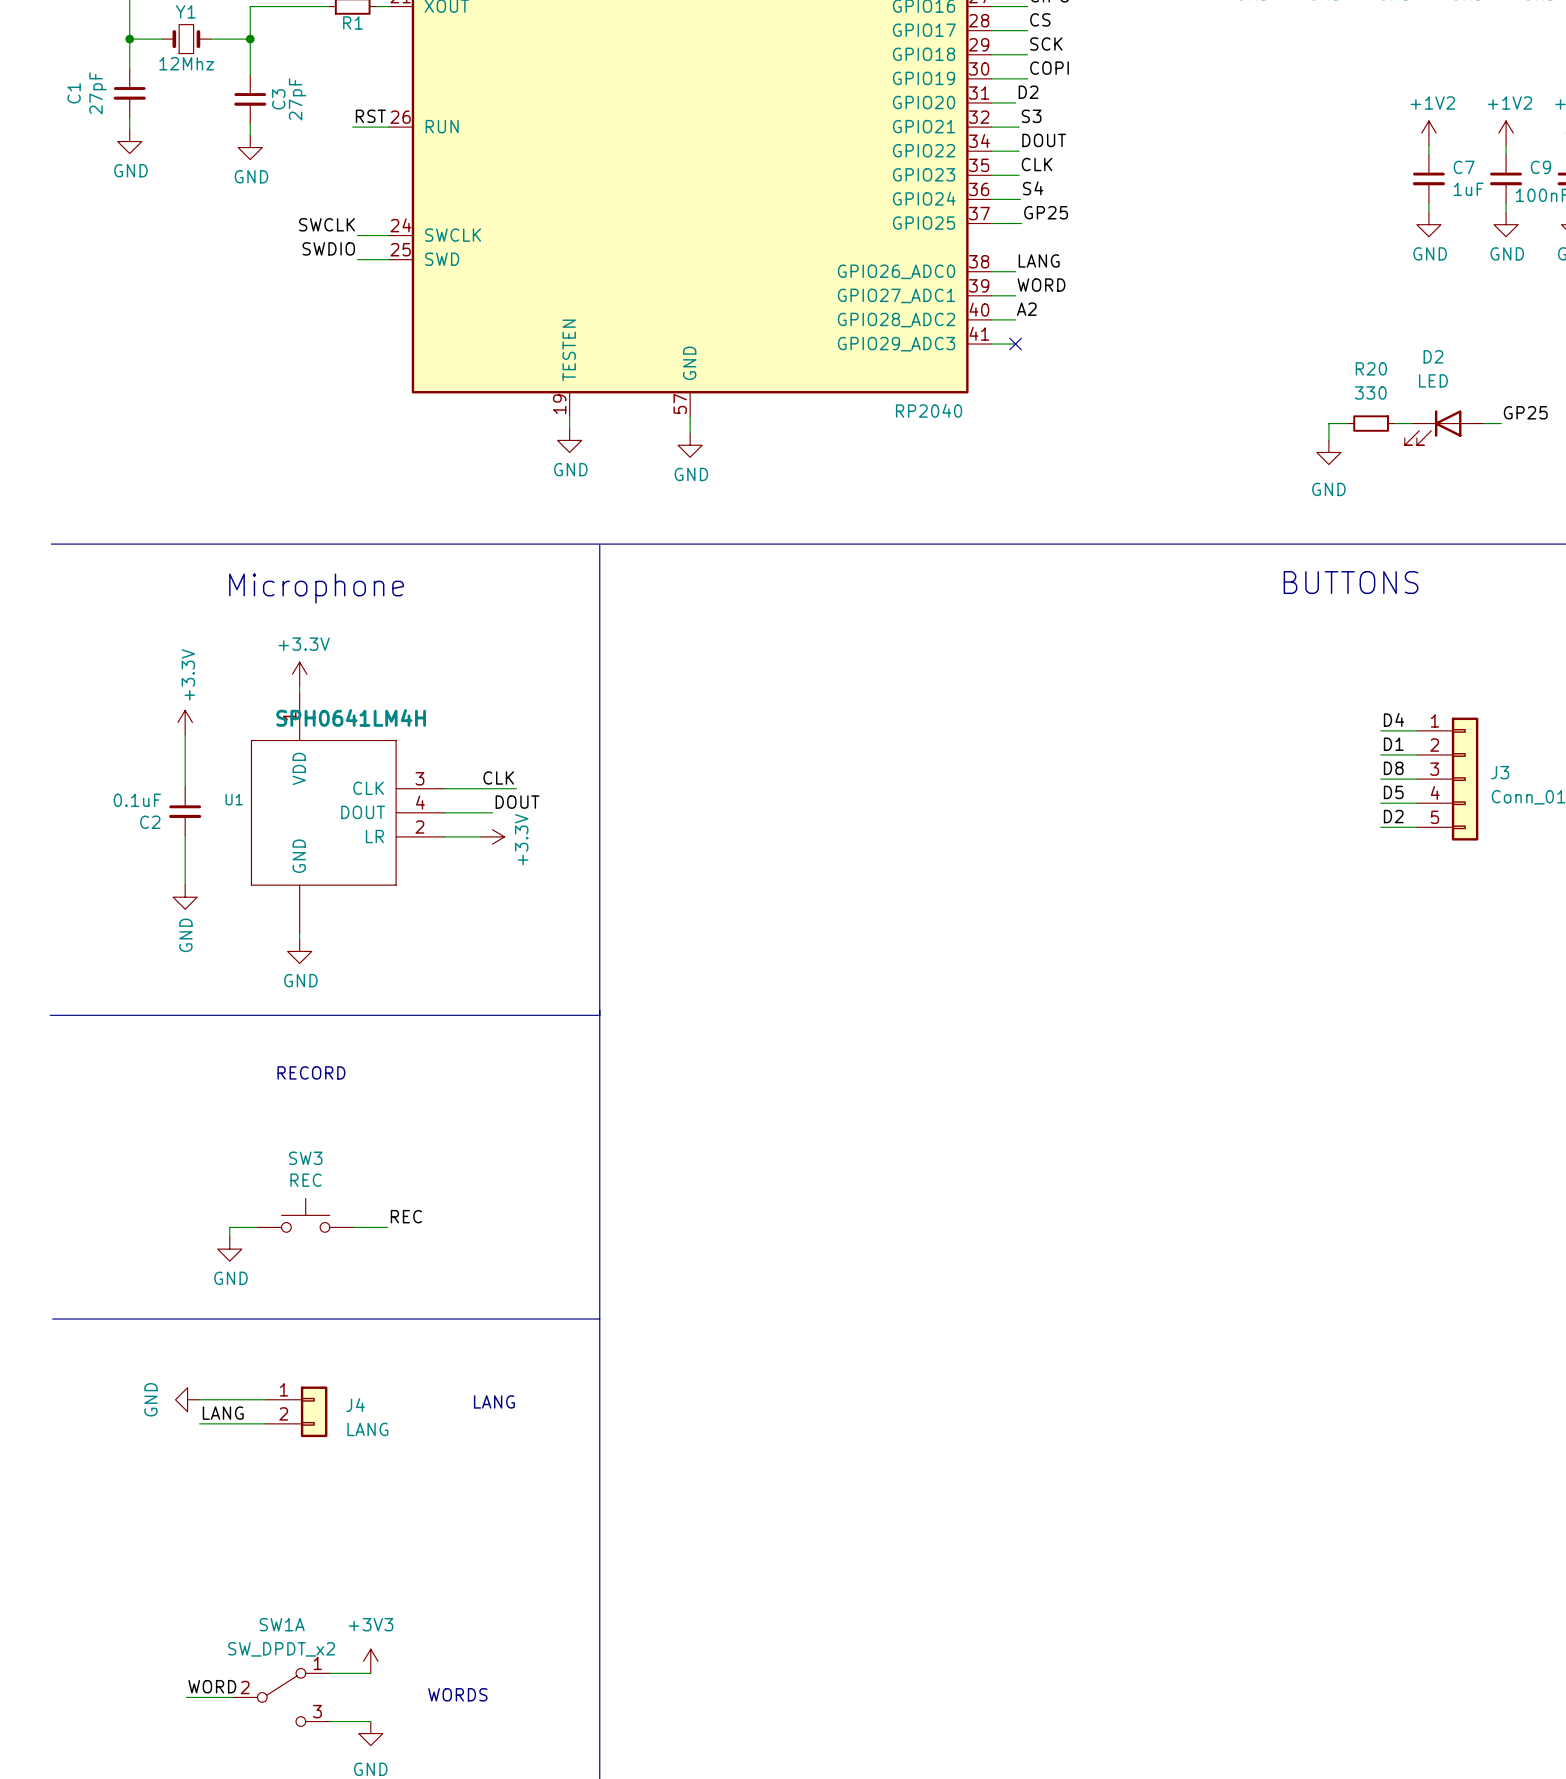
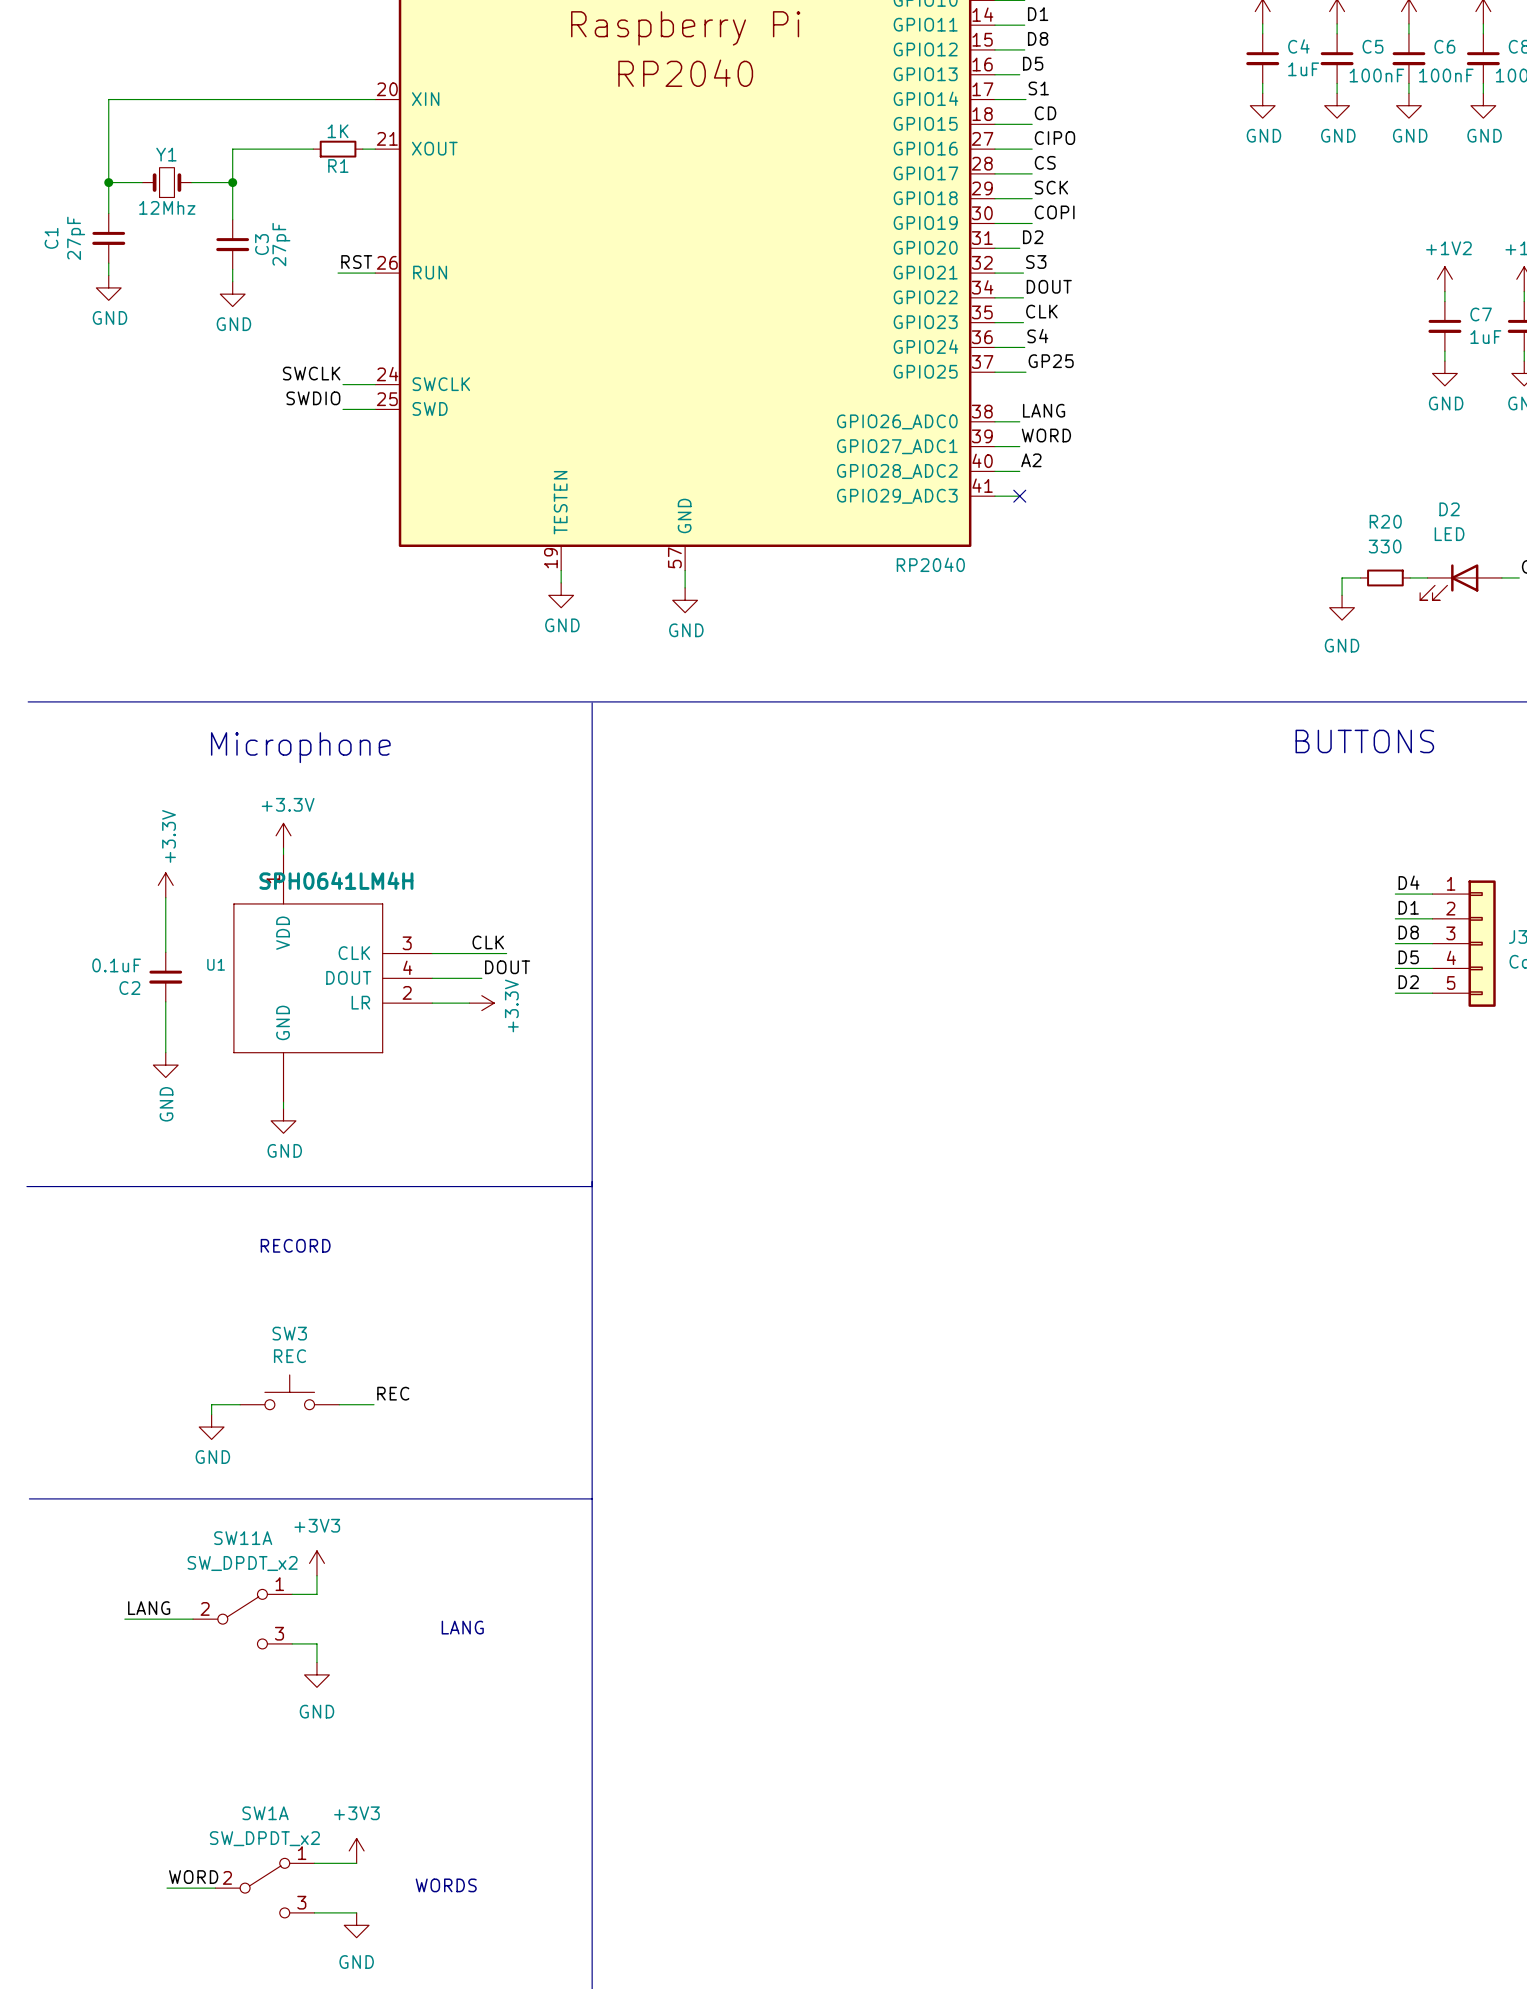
power symbol: none -> +3V3 (316, 1563)
wire: none -> (316, 1575) (316, 1594) (292, 1594)
power symbol rotation: 0° (187, 1399) -> 90° counterclockwise (316, 1674)
power symbol position: GND (187, 1399) -> GND (316, 1674)
wire: (199, 1399) (265, 1399) -> none
text position: LANG (494, 1401) -> LANG (462, 1627)
J4: LANG (296, 1411) -> none
label position: LANG (223, 1413) -> LANG (149, 1608)
wire: (199, 1423) (265, 1423) -> (124, 1619) (193, 1619)
SW11A: none -> SW_DPDT_x2 (242, 1619)
wire: none -> (292, 1643) (316, 1643) (316, 1662)

